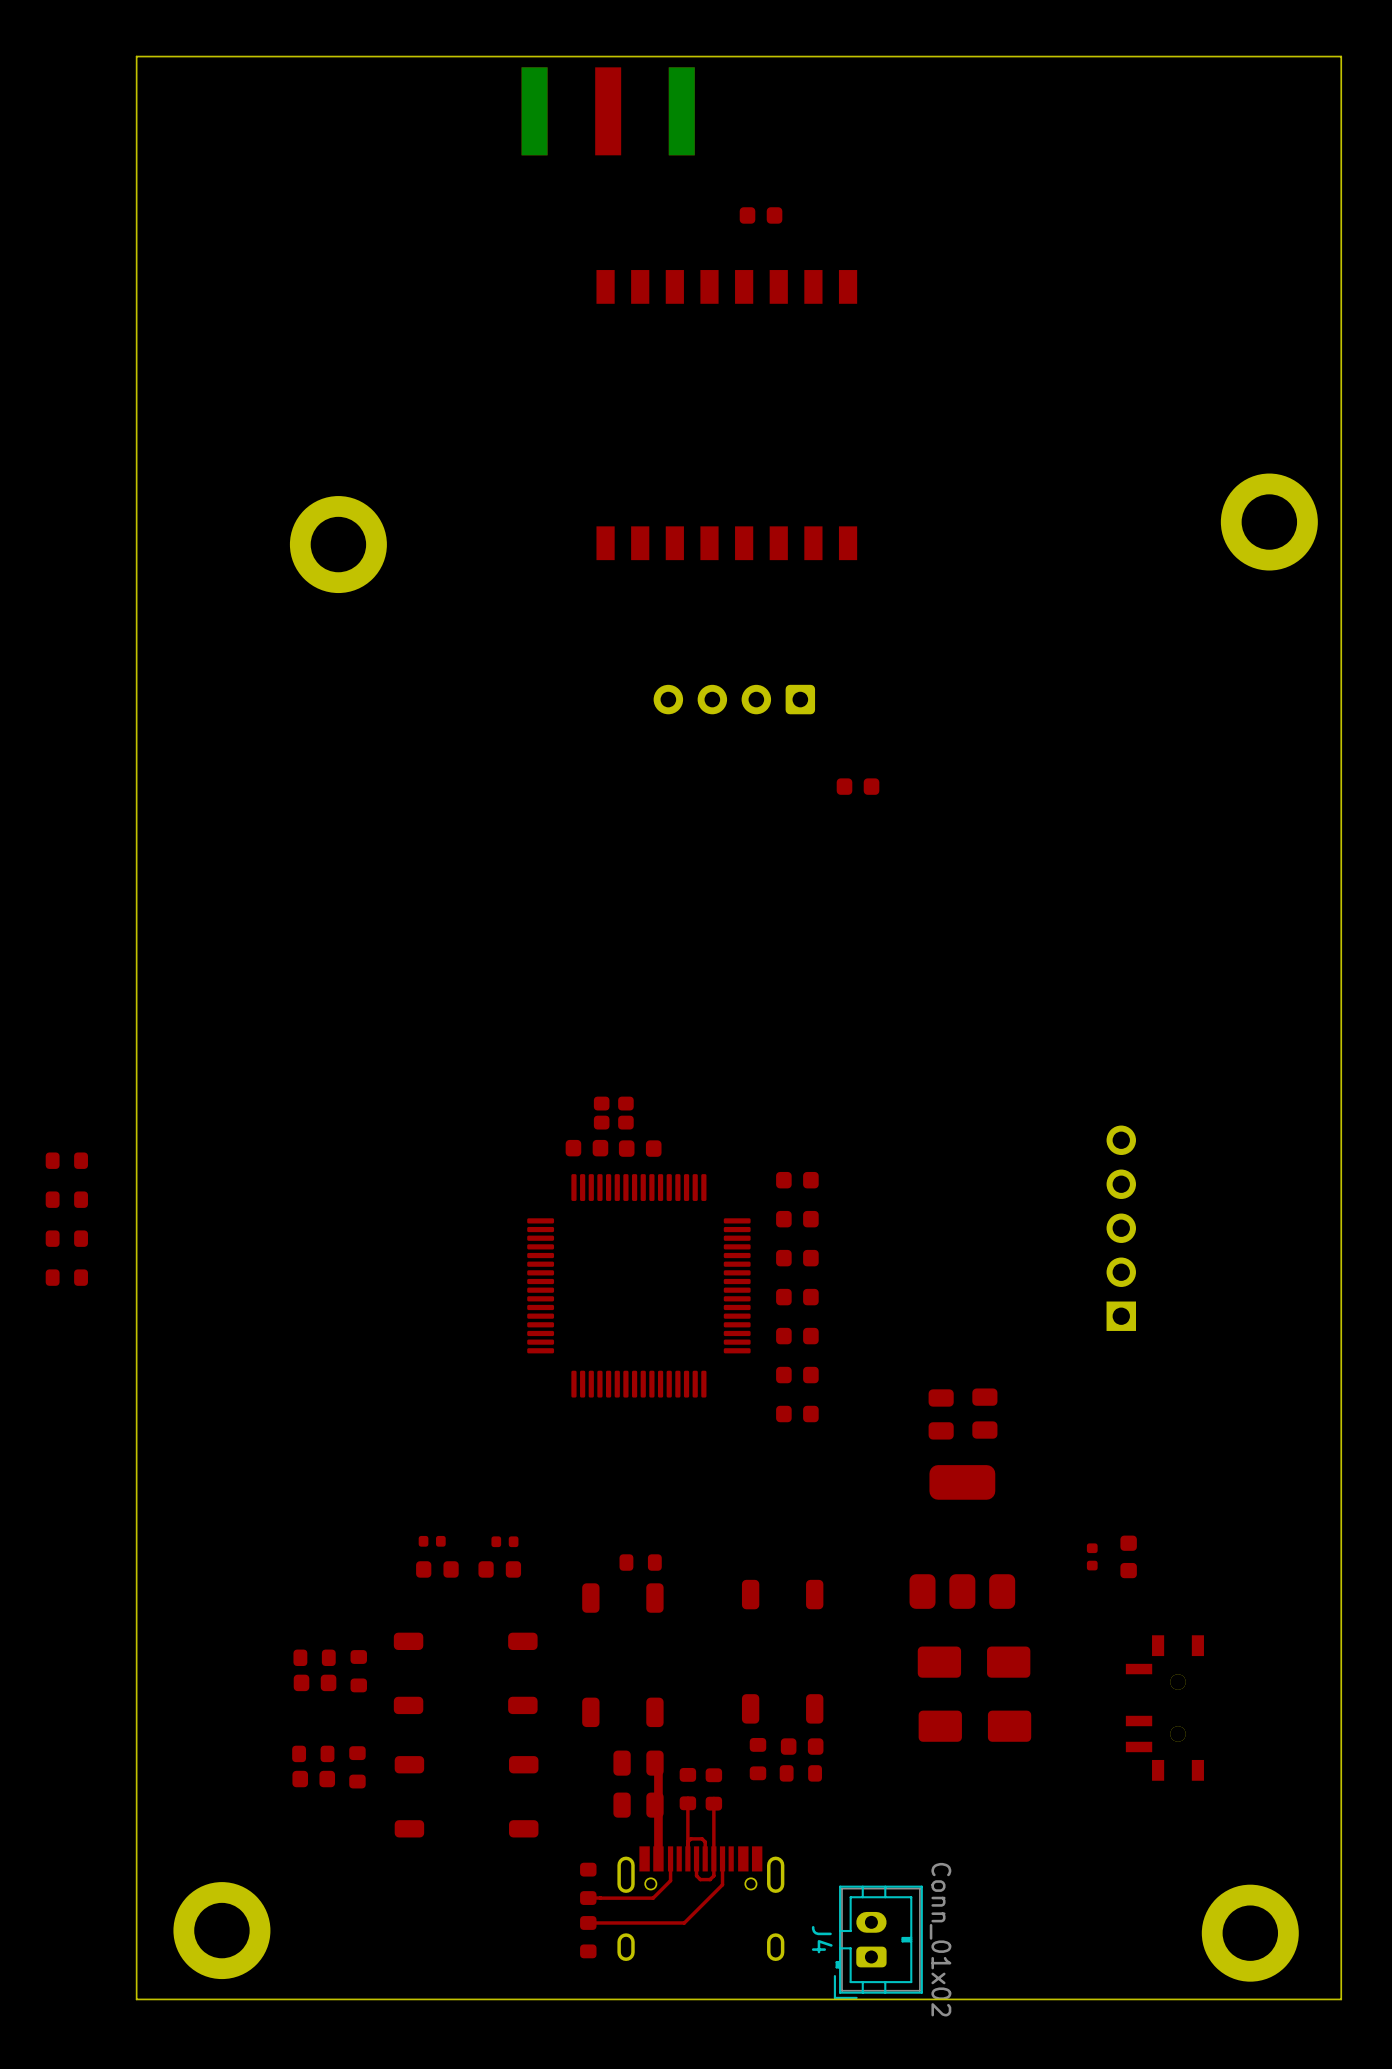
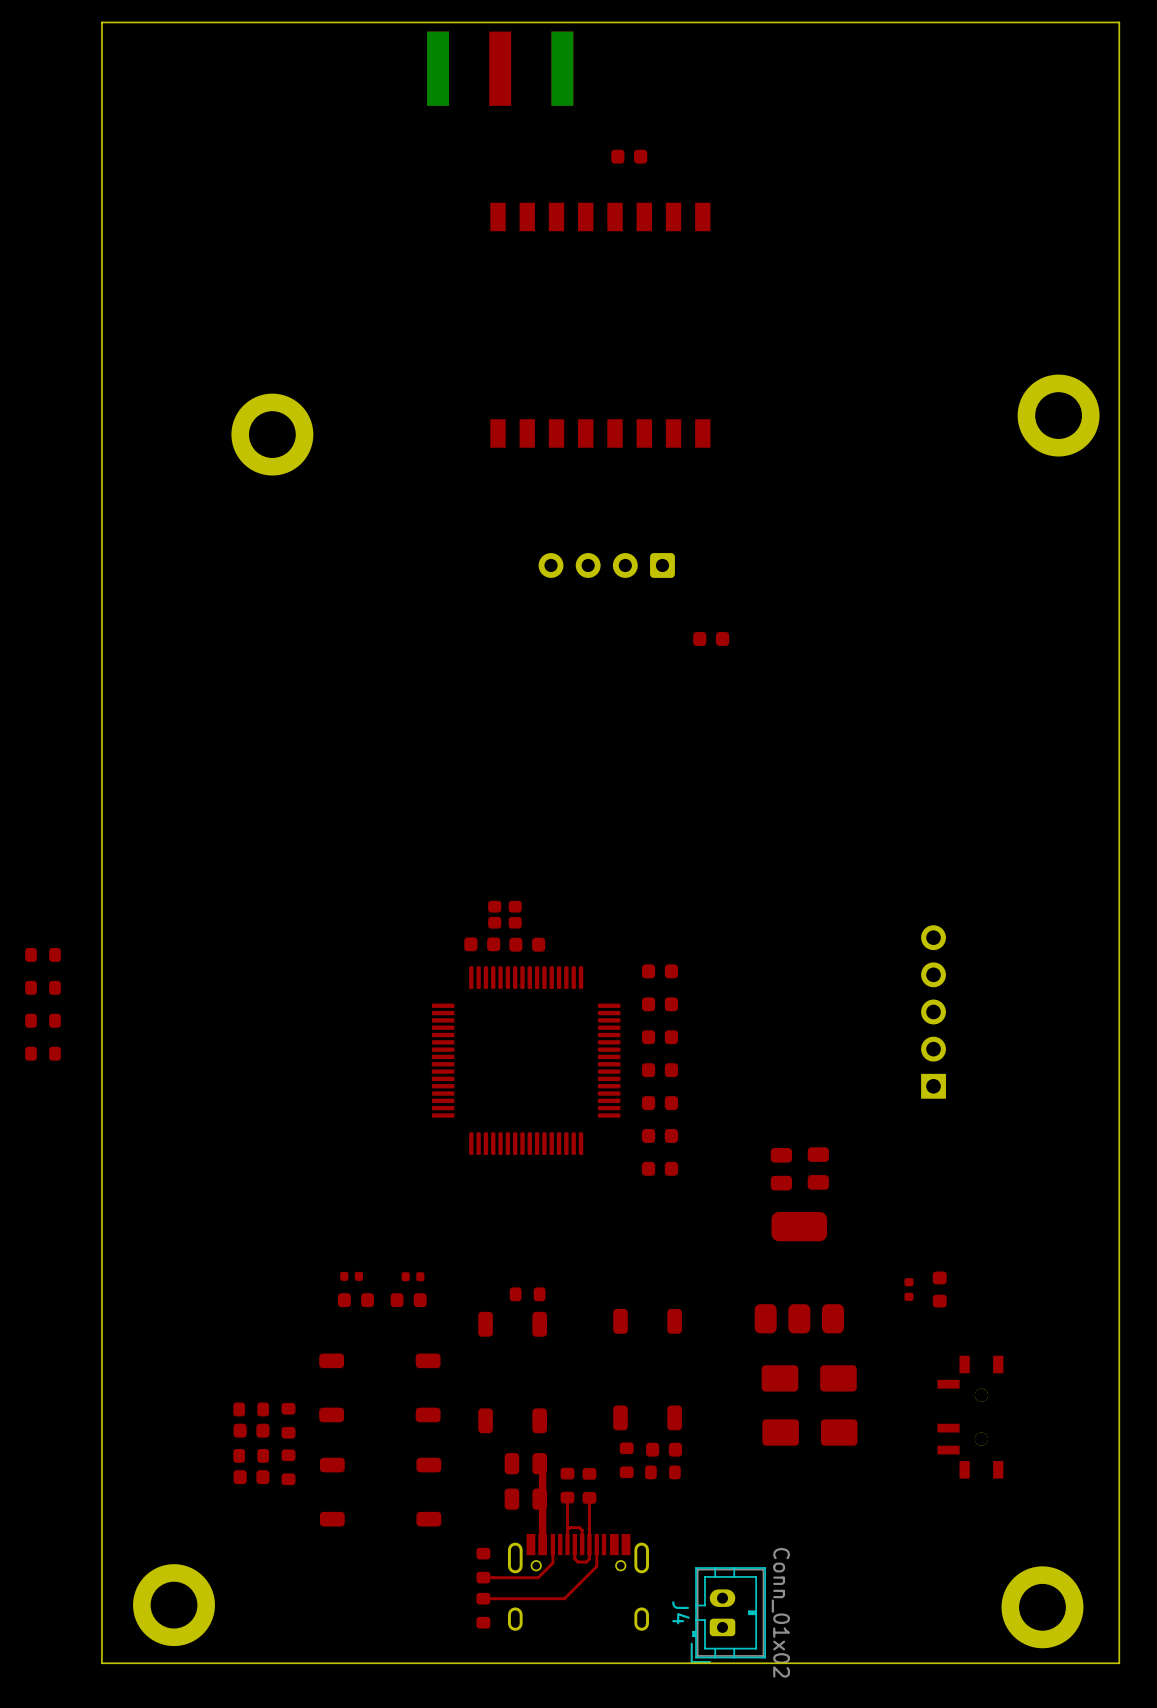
part: (314, 1657) -> none
part: (358, 1671) -> none
part footprint: [293, 1674, 337, 1692] -> [233, 1402, 270, 1417]
part: none -> (288, 1420)
part: none -> (251, 1430)

